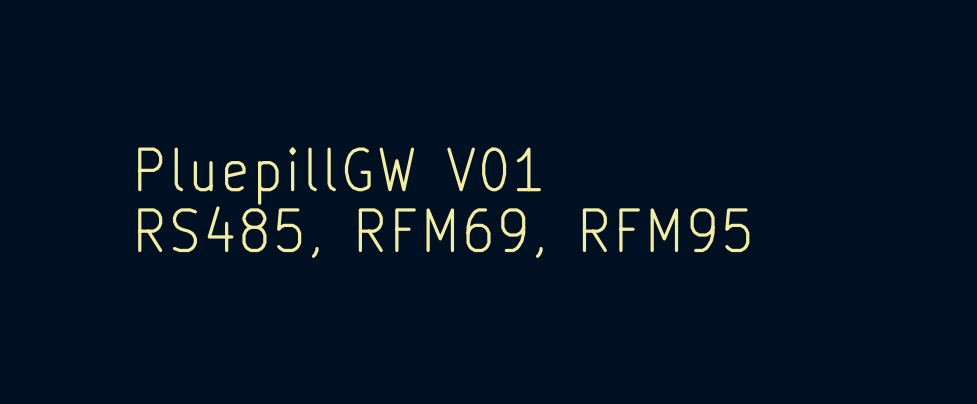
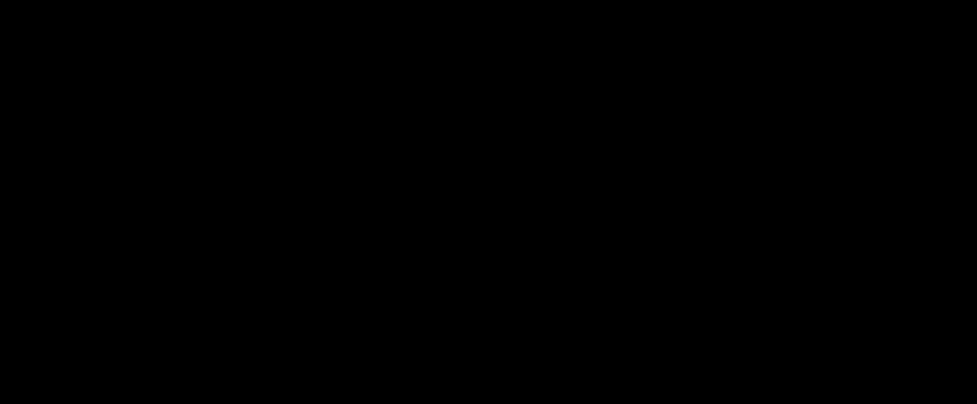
text: PluepillGW V01 (339, 176) -> none
text: RS485, RFM69, RFM95 (443, 232) -> none

